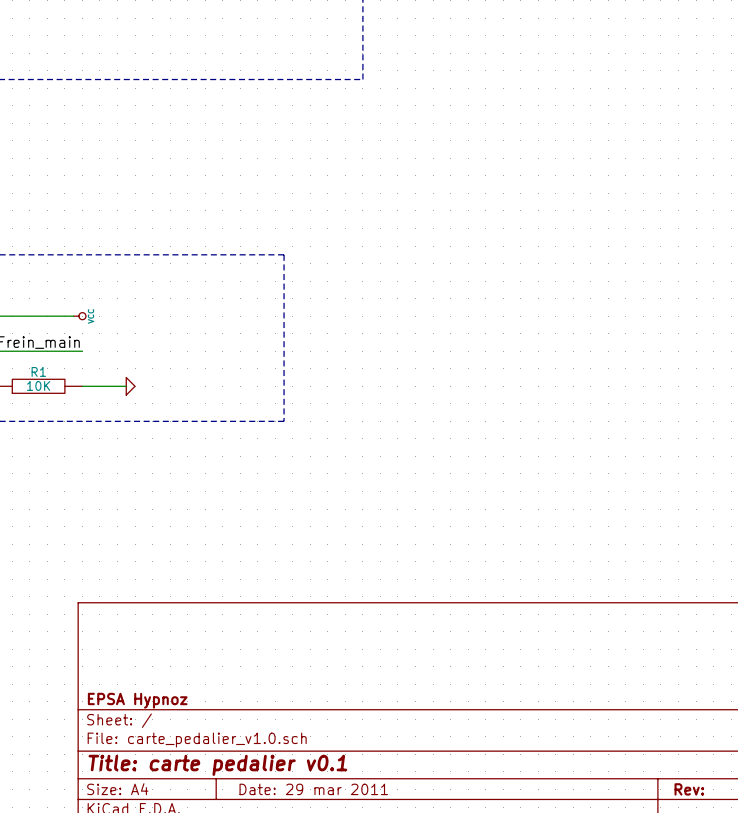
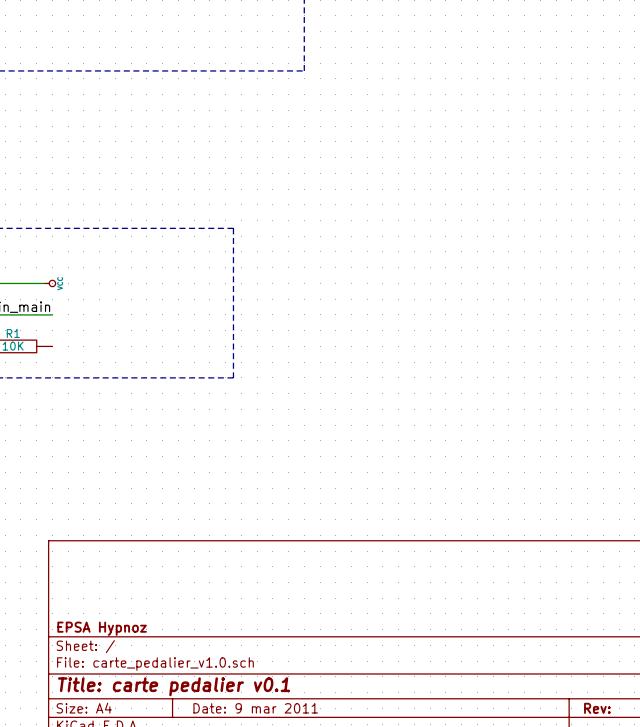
wire: (82, 386) (126, 386) -> none
power symbol: (130, 386) -> none
title block: Date: 29 mar 2011 (313, 789) -> Date: 9 mar 2011 (255, 708)

